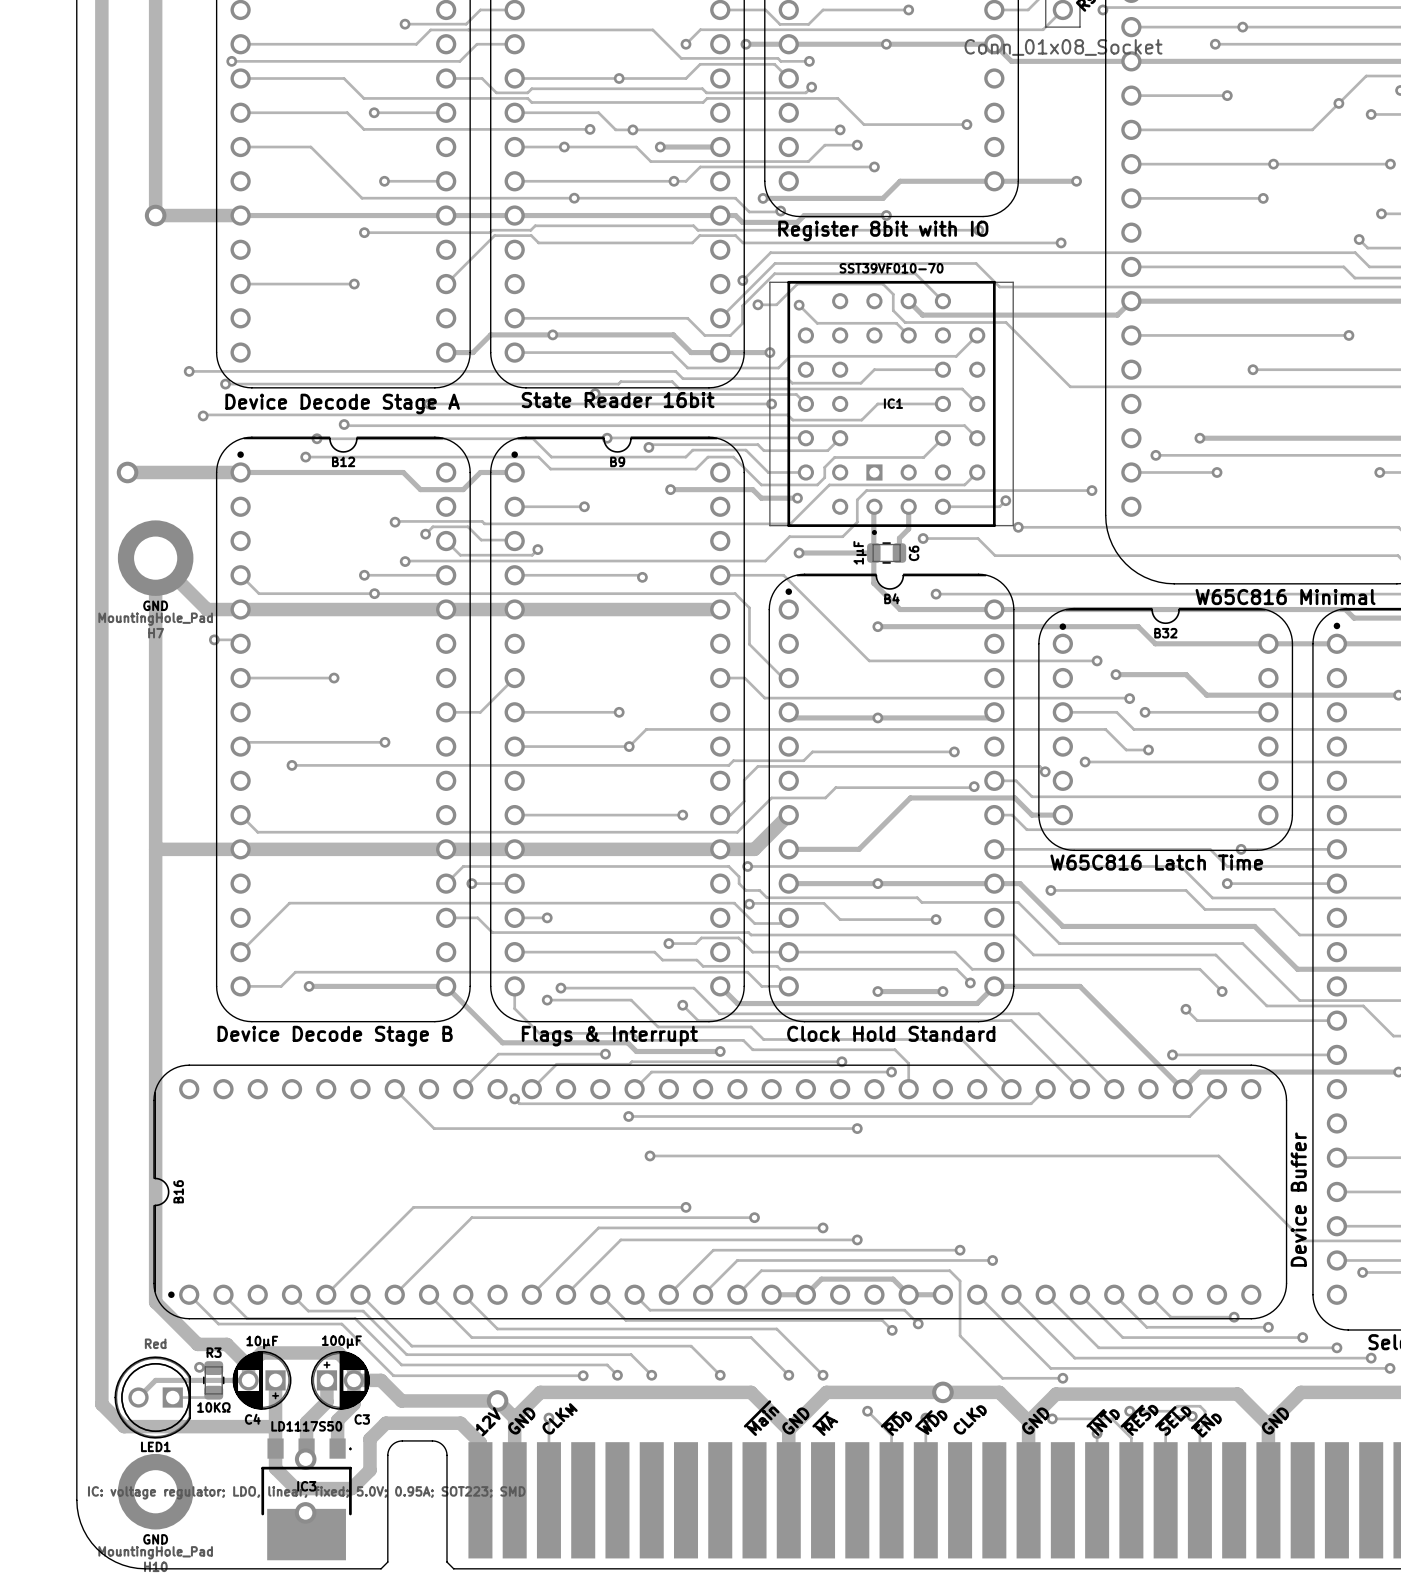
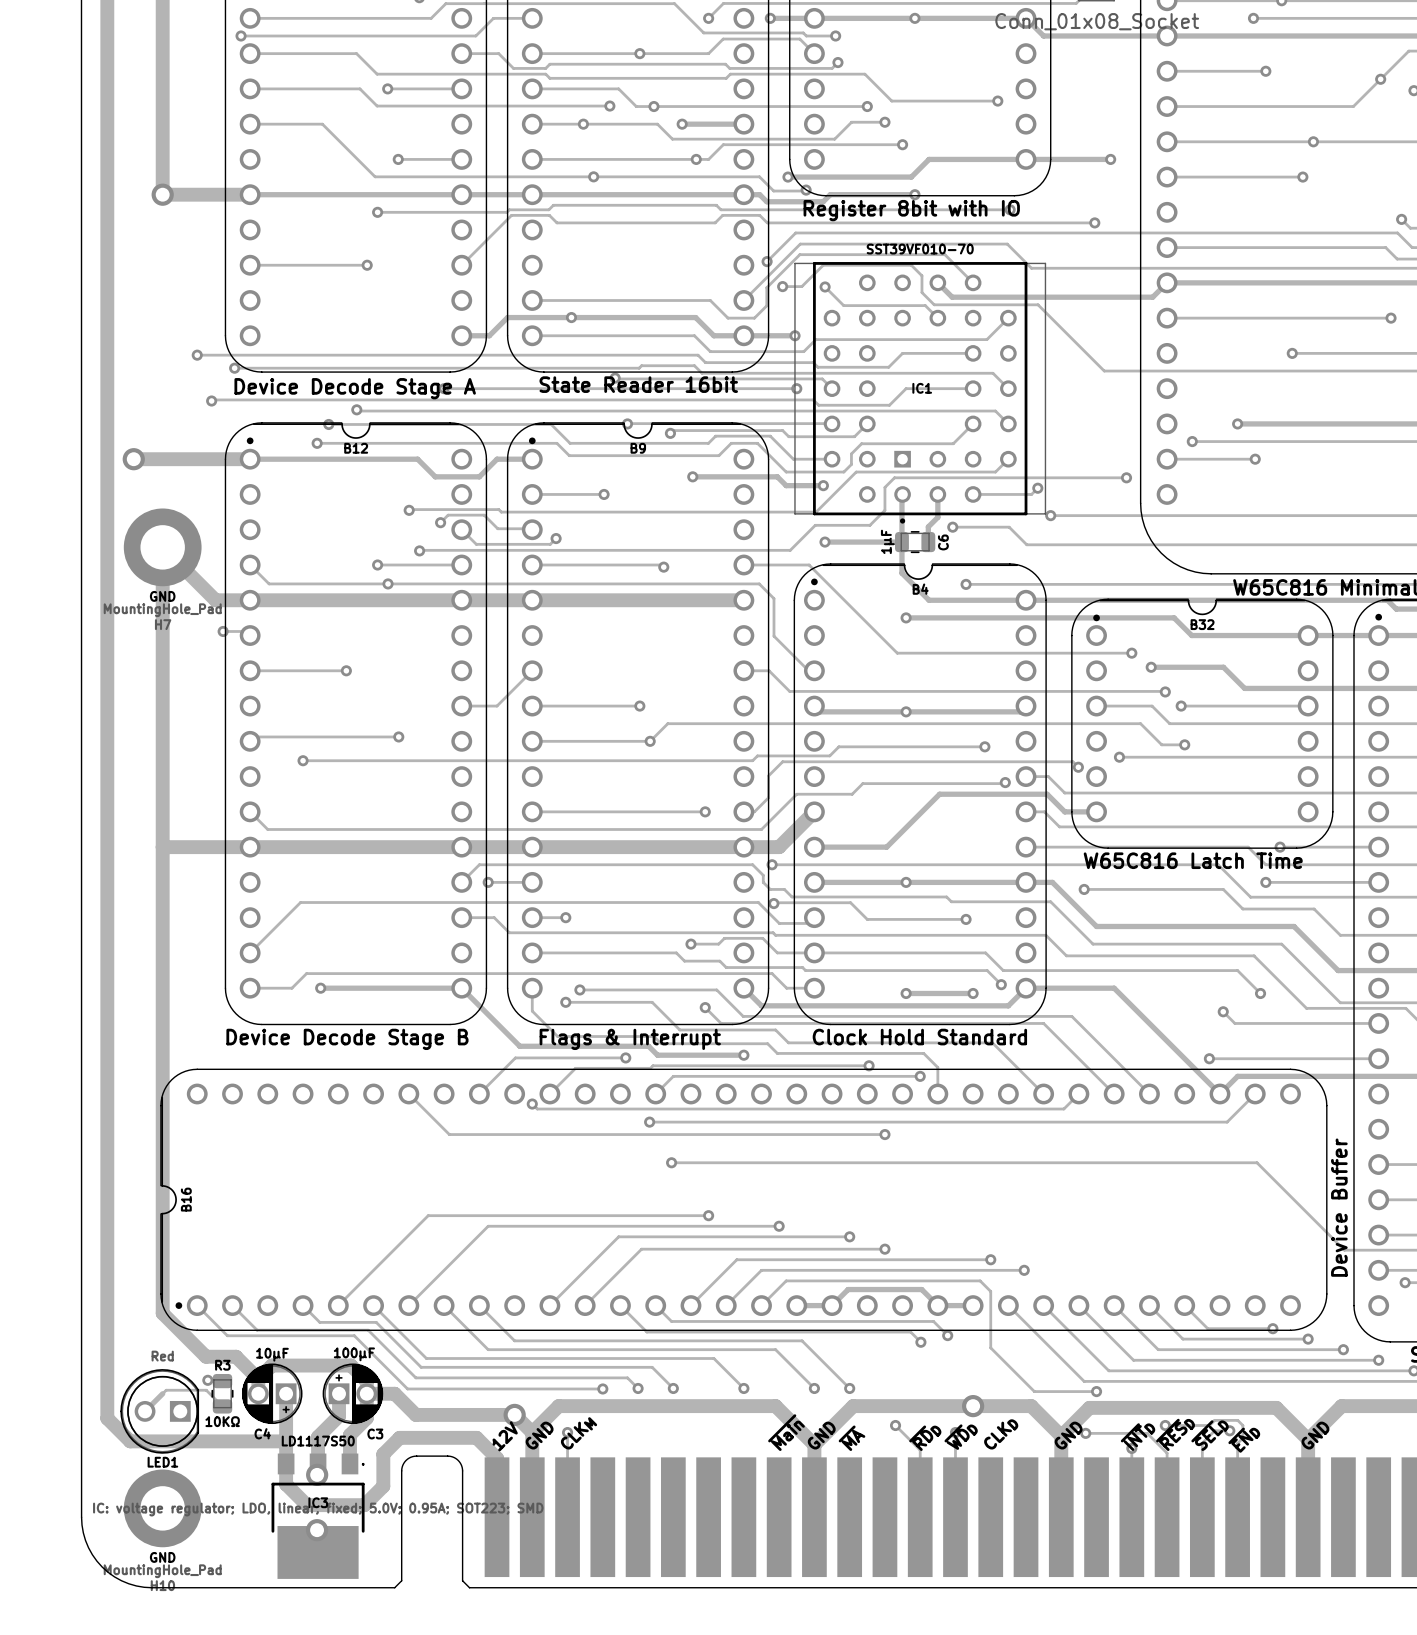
track: (155, 1380) (248, 1380) -> (162, 1393) (166, 1390) (206, 1390) (222, 1406)
track: (172, 1397) (208, 1397) -> none

